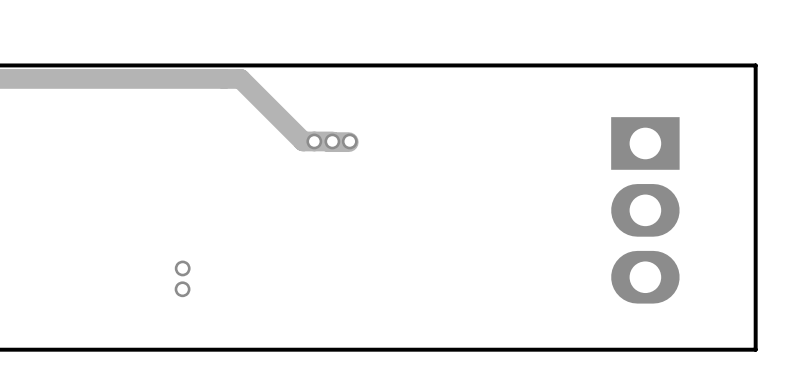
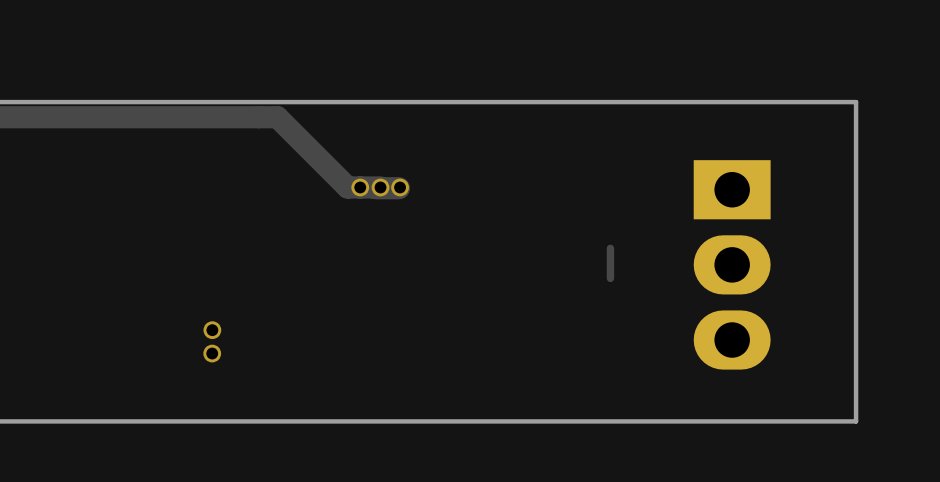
track: none -> (610, 248) (610, 278)

